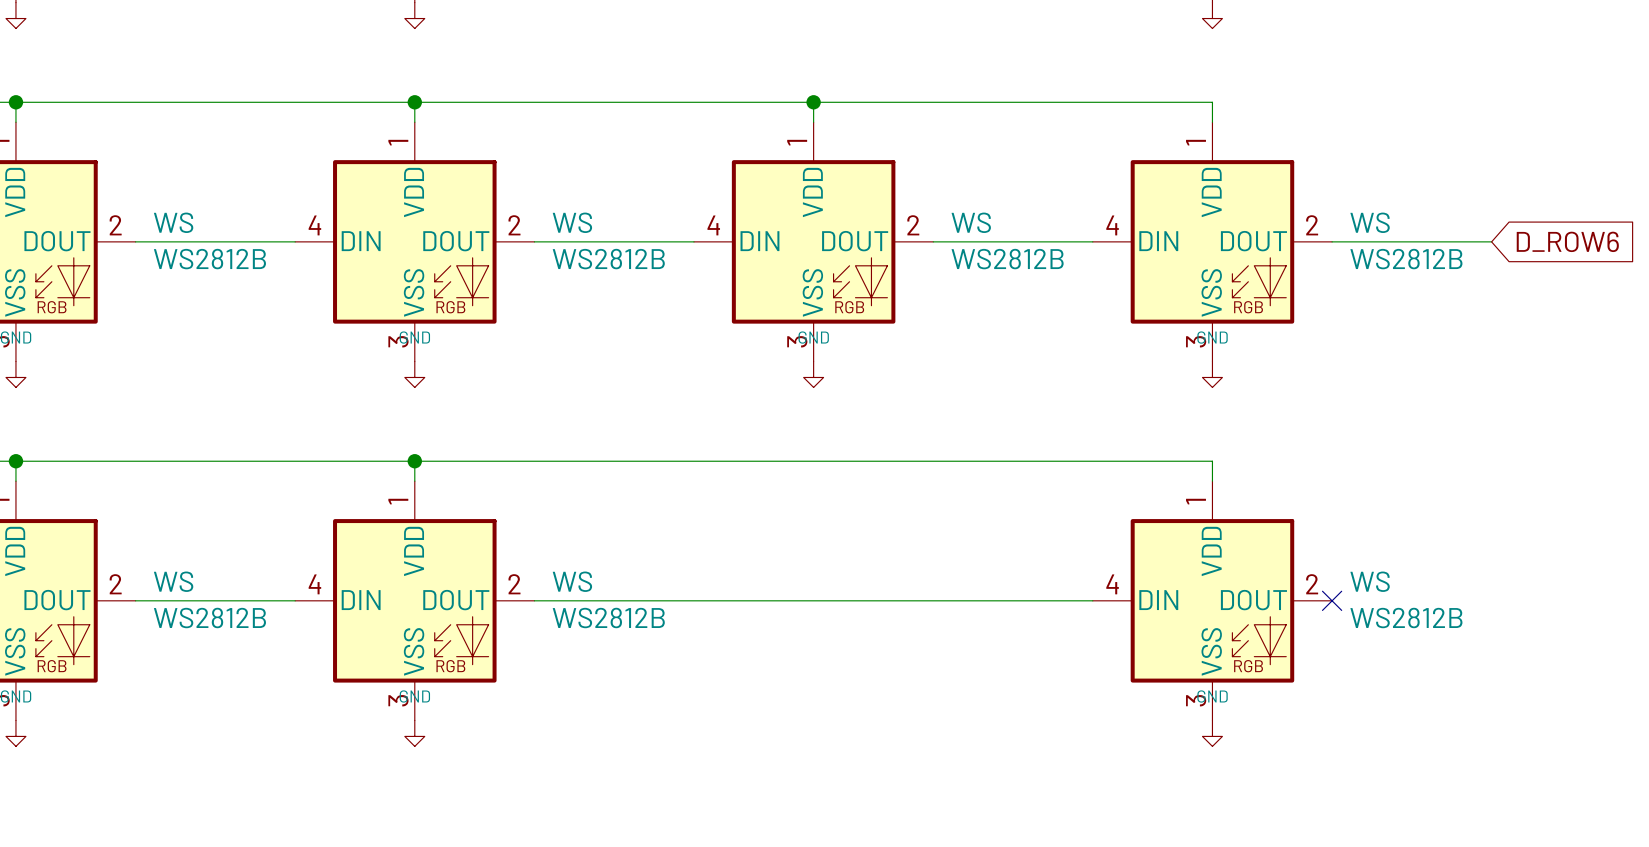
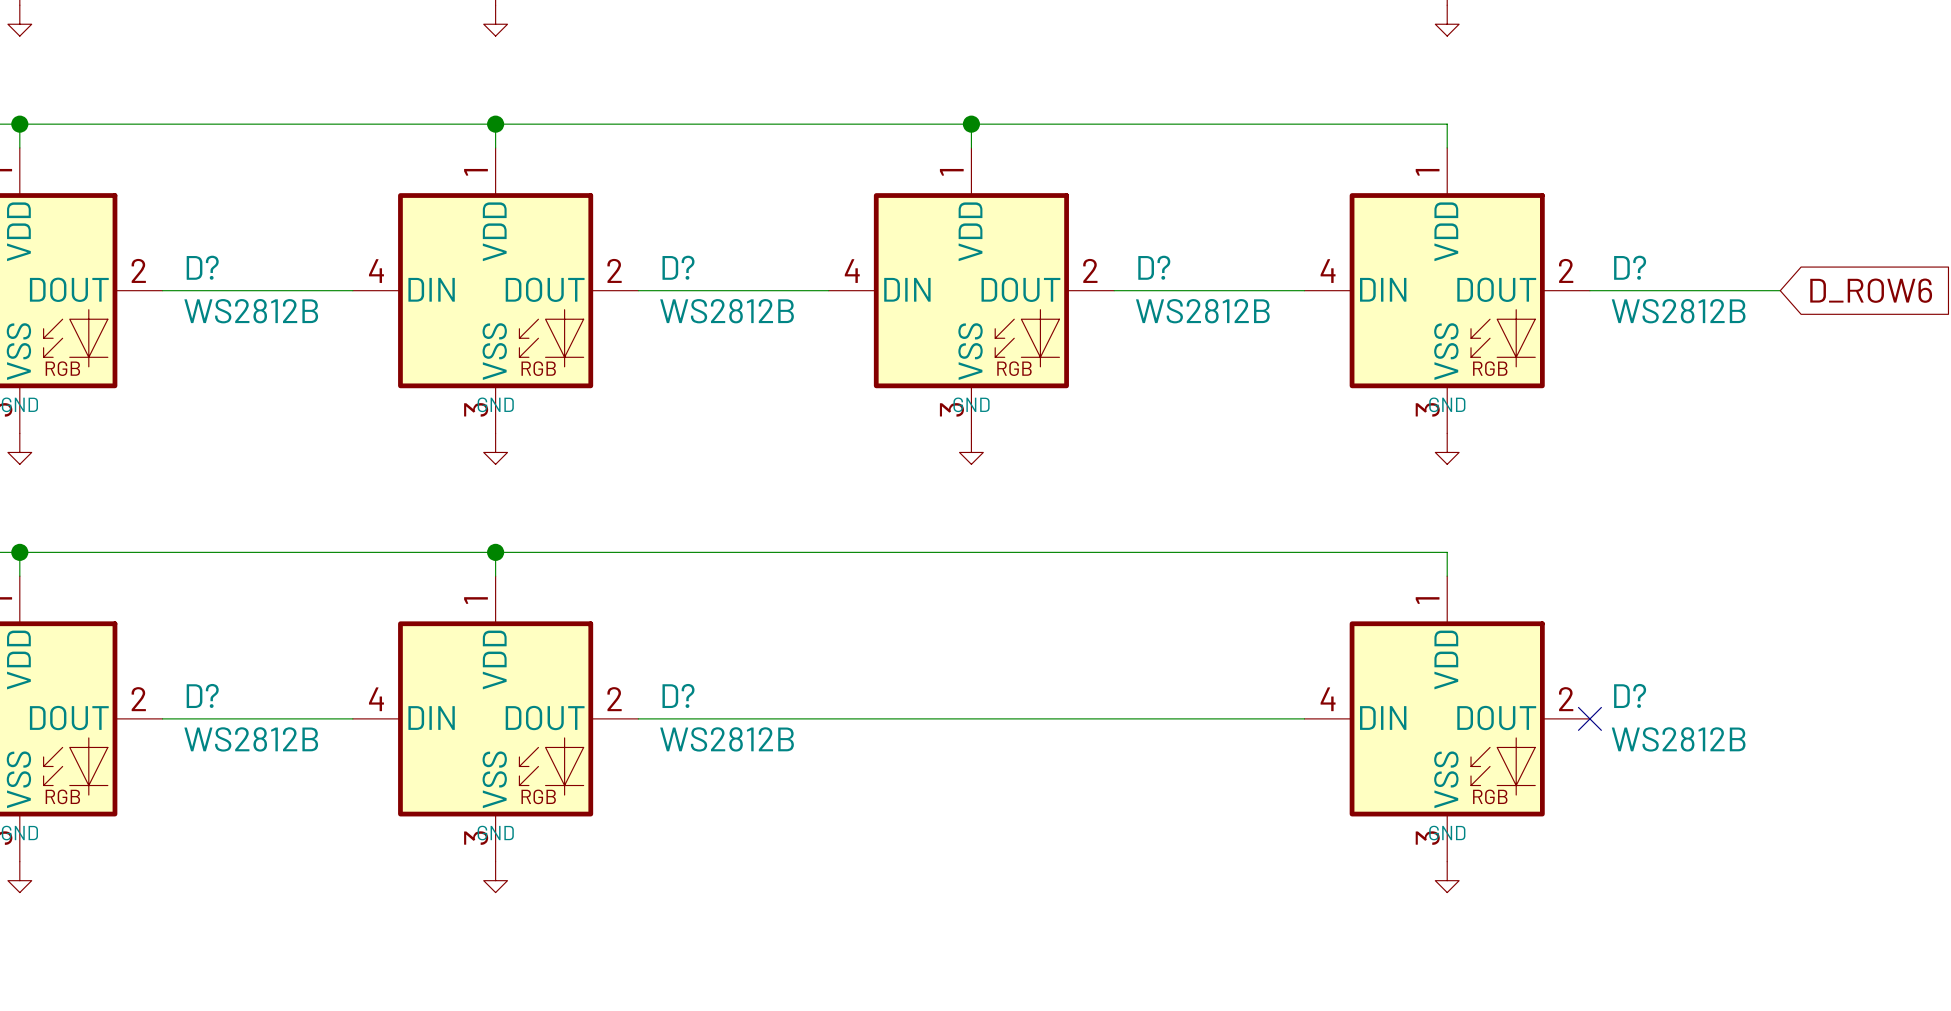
WS name: WS (173, 222) -> D? (202, 267)
WS name: WS (572, 222) -> D? (678, 267)
WS name: WS (971, 222) -> D? (1154, 267)
WS name: WS (1370, 222) -> D? (1630, 267)
WS name: WS (173, 581) -> D? (202, 695)
WS name: WS (572, 581) -> D? (678, 695)
WS name: WS (1370, 581) -> D? (1630, 695)

